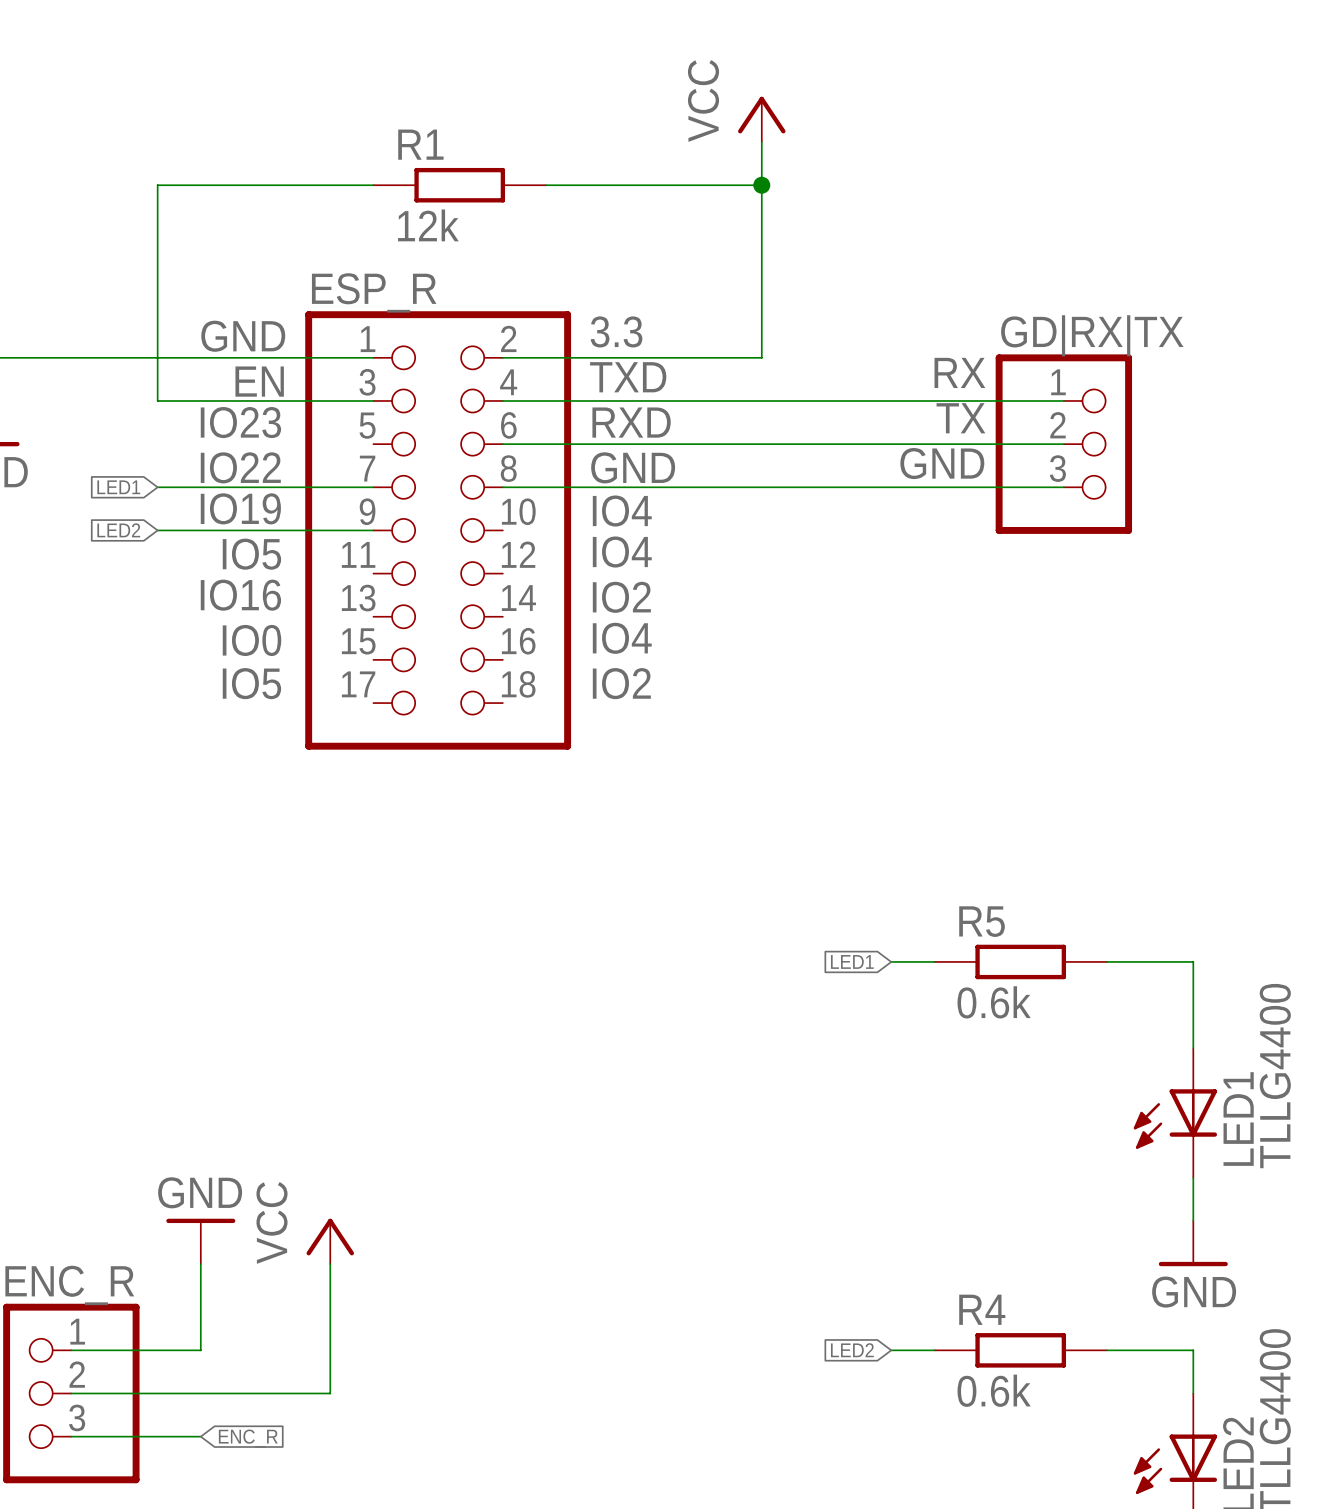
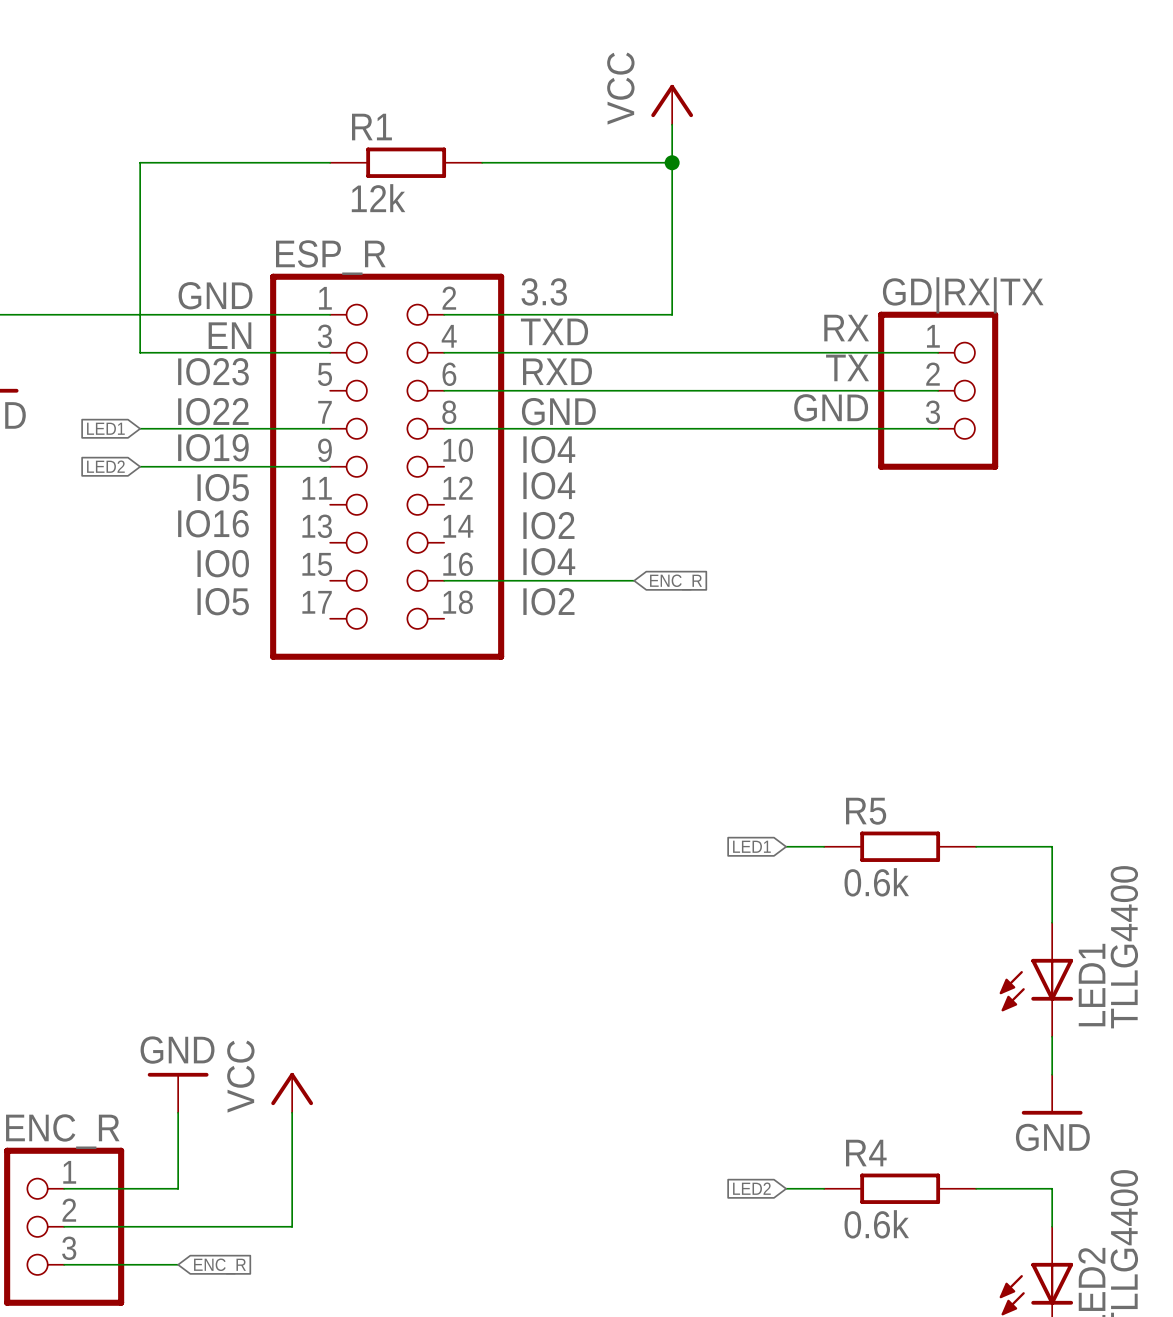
wire: none -> (444, 580) (634, 580)
global label: none -> ENC_R (675, 582)

